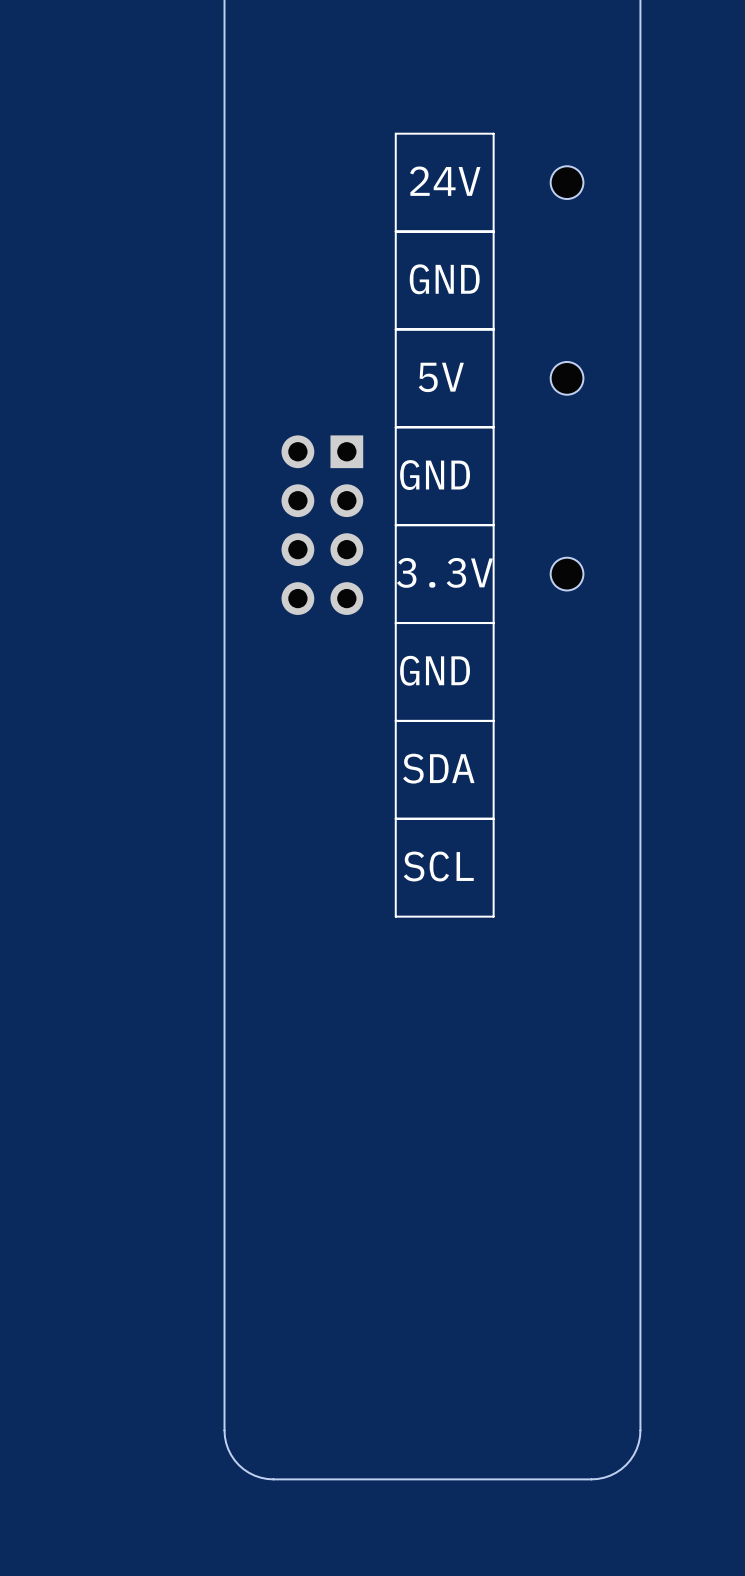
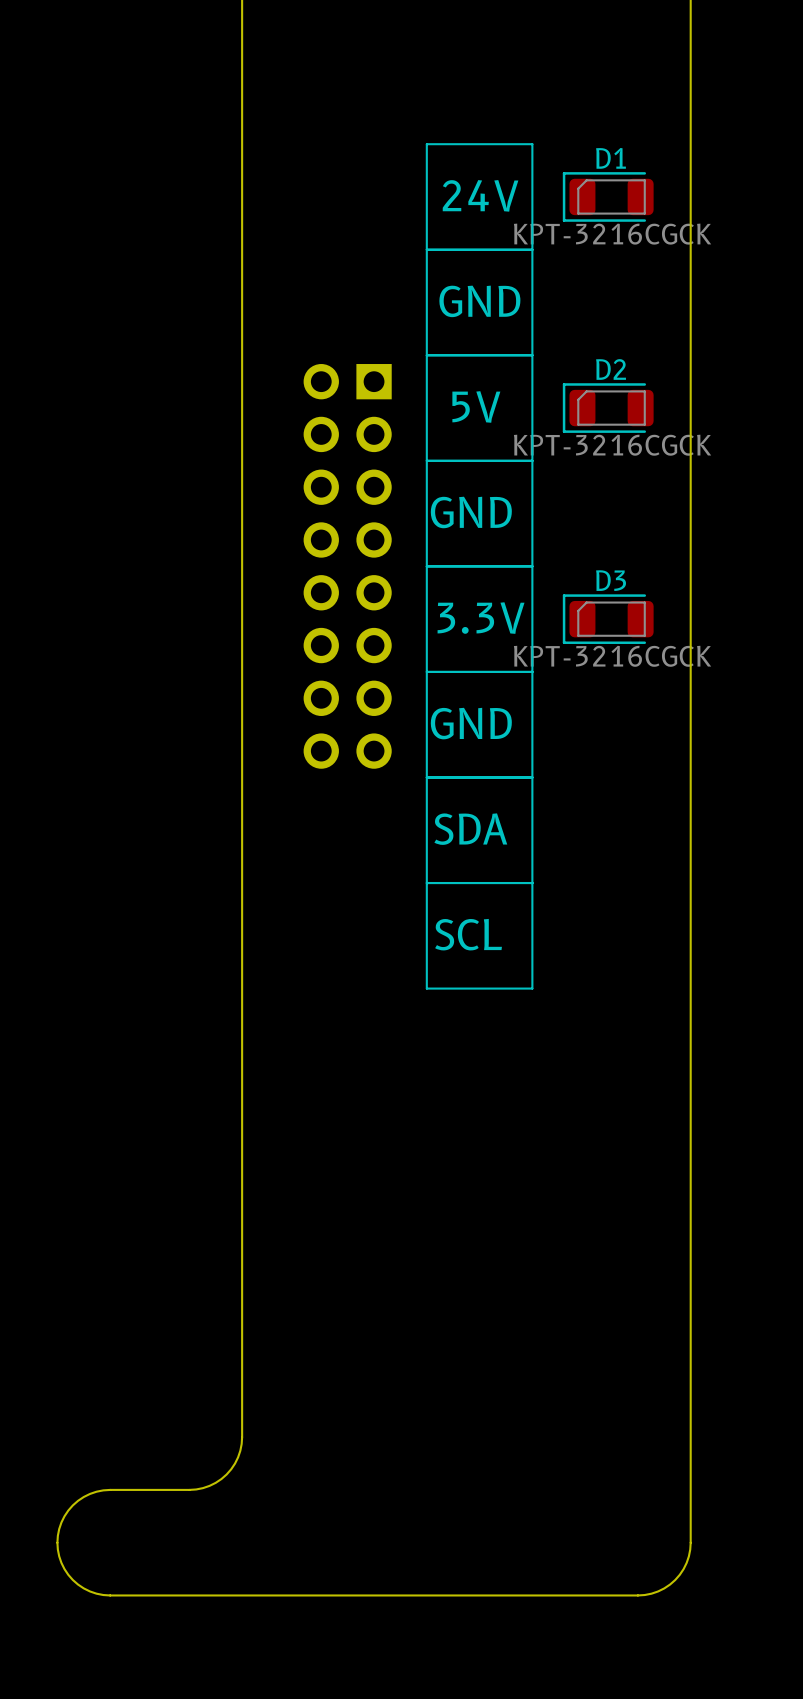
D1: none -> KPT-3216CGCK (608, 196)
part: (567, 182) -> none
D2: none -> KPT-3216CGCK (608, 408)
part: (567, 378) -> none
part footprint: [281, 435, 364, 615] -> [303, 364, 392, 769]
D3: none -> KPT-3216CGCK (608, 619)
part: (567, 574) -> none
board edge: (224, 1332) (226, 1443) (231, 1454) (243, 1469) (260, 1477) (273, 1479) -> (242, 1437) (238, 1457) (231, 1469) (221, 1479) (209, 1485) (189, 1489) (103, 1490) (83, 1496) (72, 1505) (61, 1522) (57, 1542) (59, 1556) (64, 1569) (72, 1580) (89, 1591) (103, 1595) (294, 1595)

